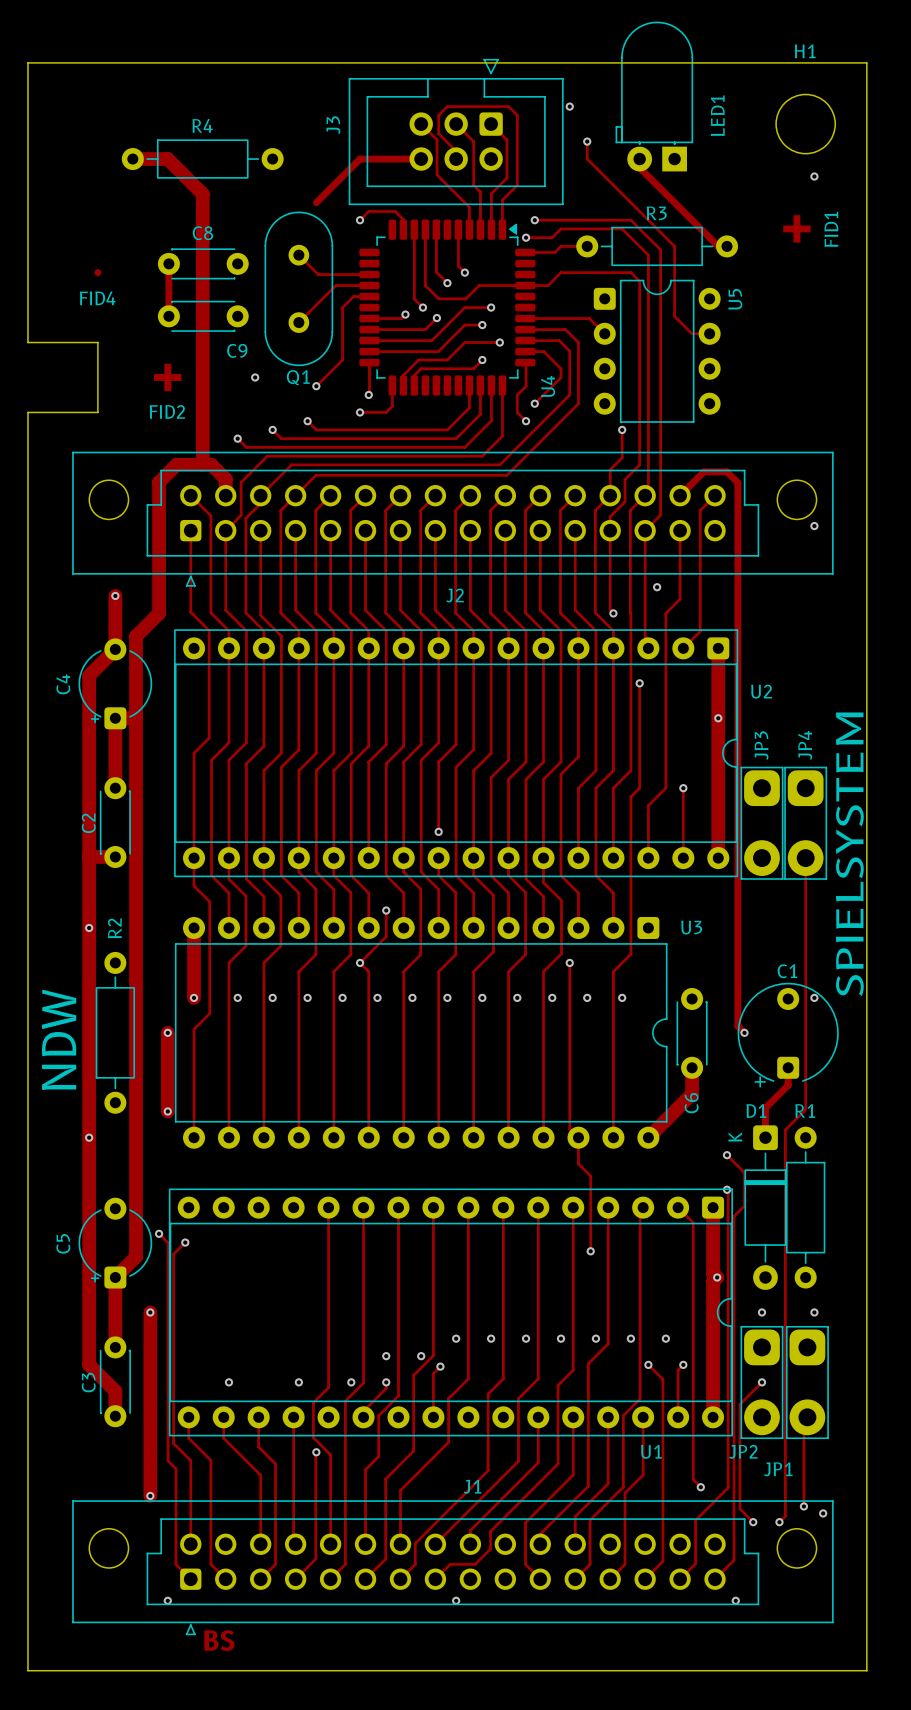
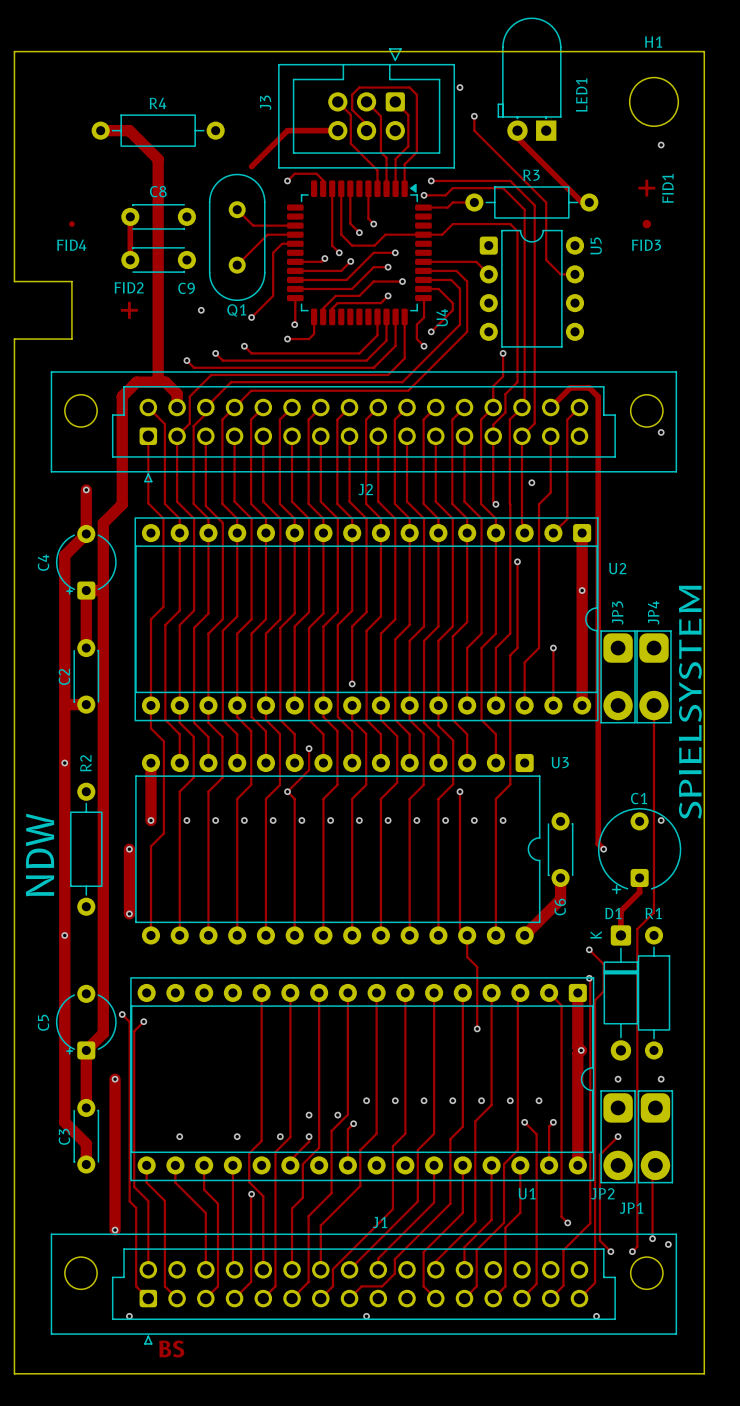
FID1 footprint: [783, 215, 811, 243] -> [638, 179, 656, 197]
FID3: none -> (646, 224)
FID2 footprint: [154, 363, 182, 392] -> [120, 301, 138, 319]
FID2 name position: FID2 (167, 411) -> FID2 (129, 287)

